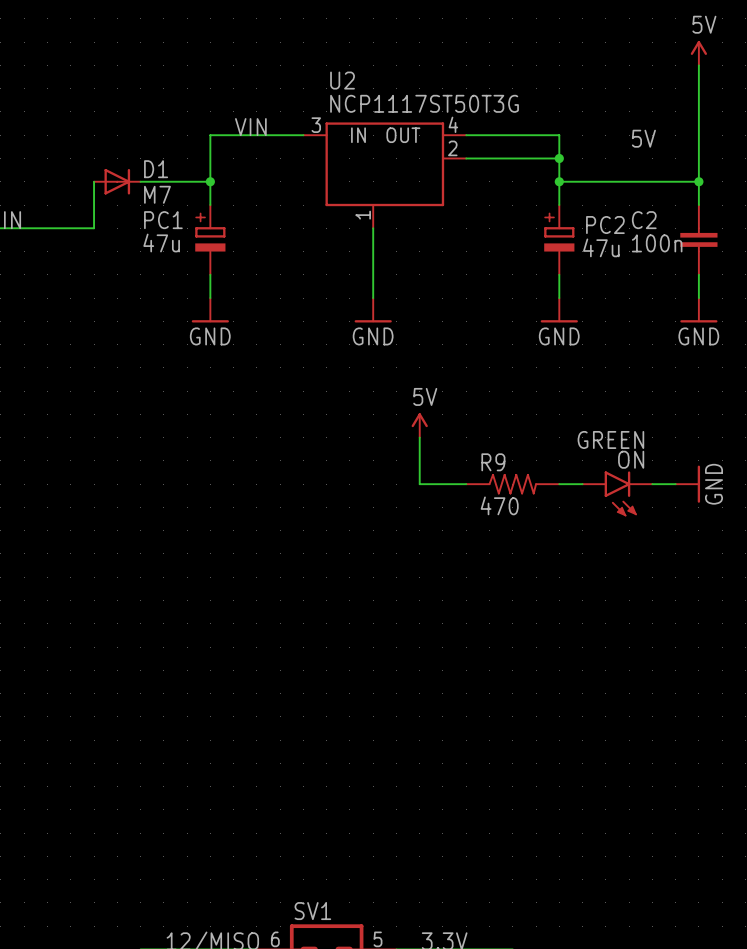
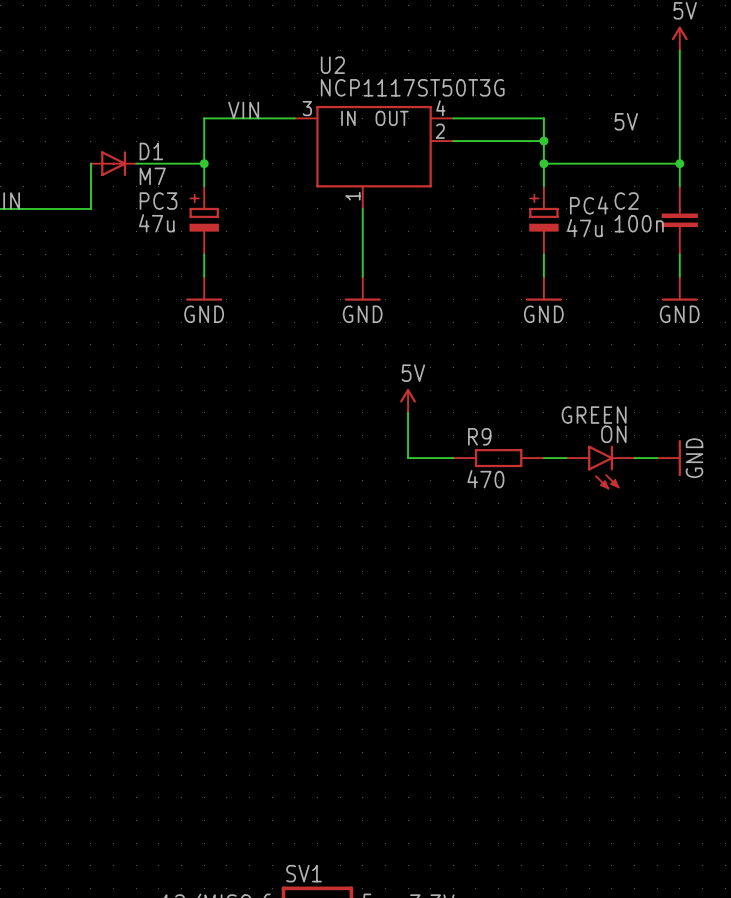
PC1 name: PC1 (163, 220) -> PC3 (158, 201)
PC2 name: PC2 (605, 225) -> PC4 (589, 205)
R9 symbol: [466, 474, 560, 495] -> [453, 449, 544, 468]

